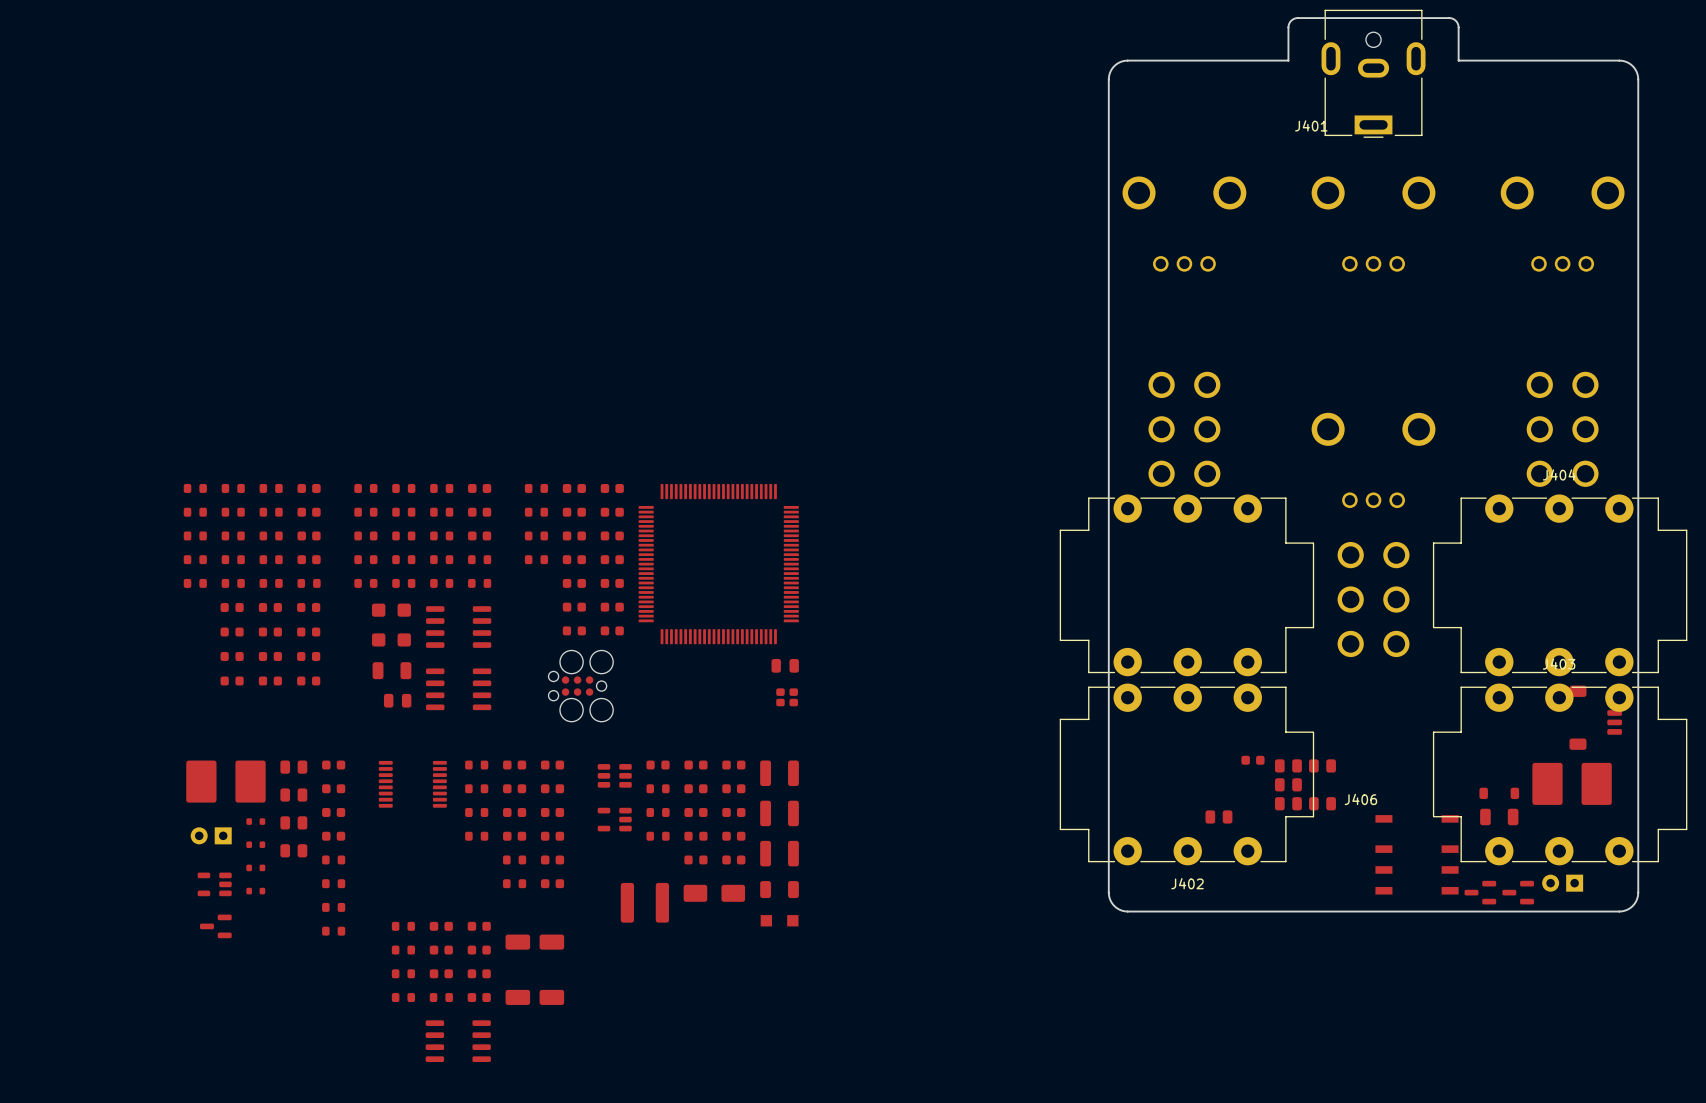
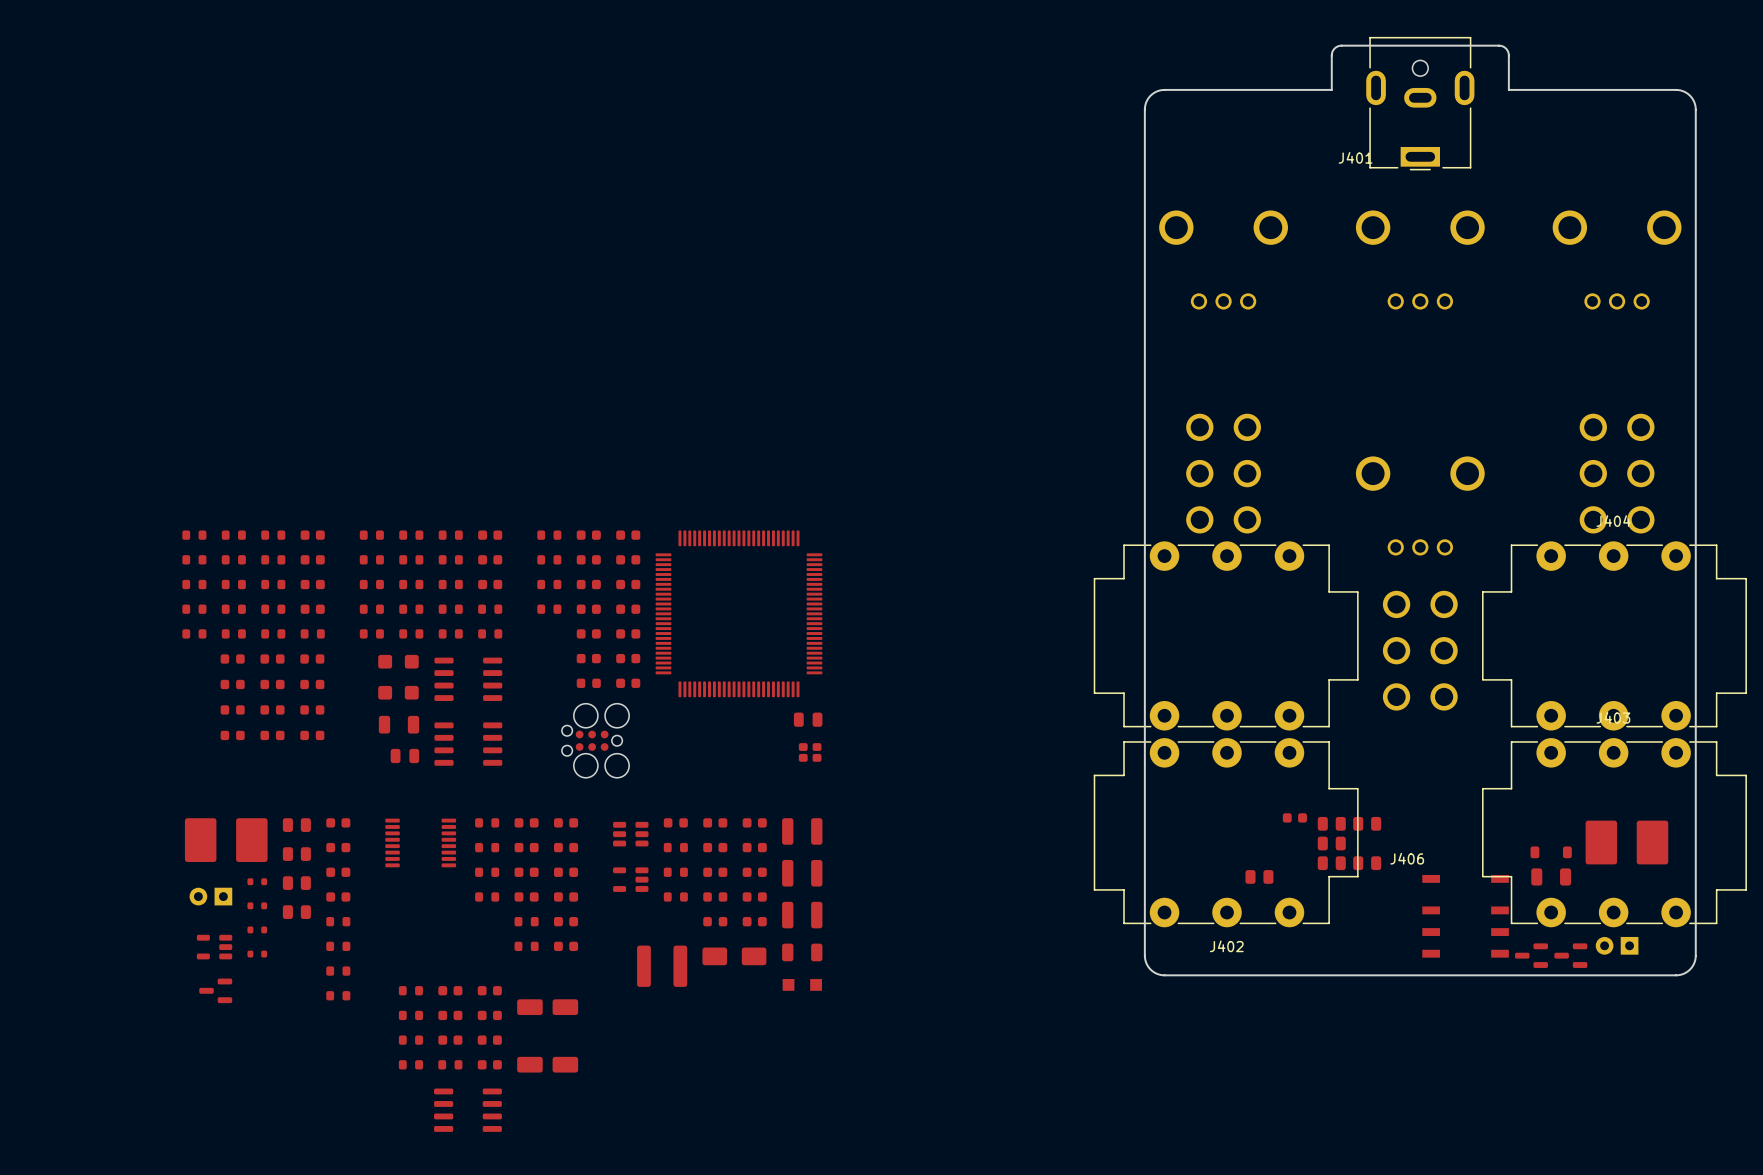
part: (1595, 717) -> none

